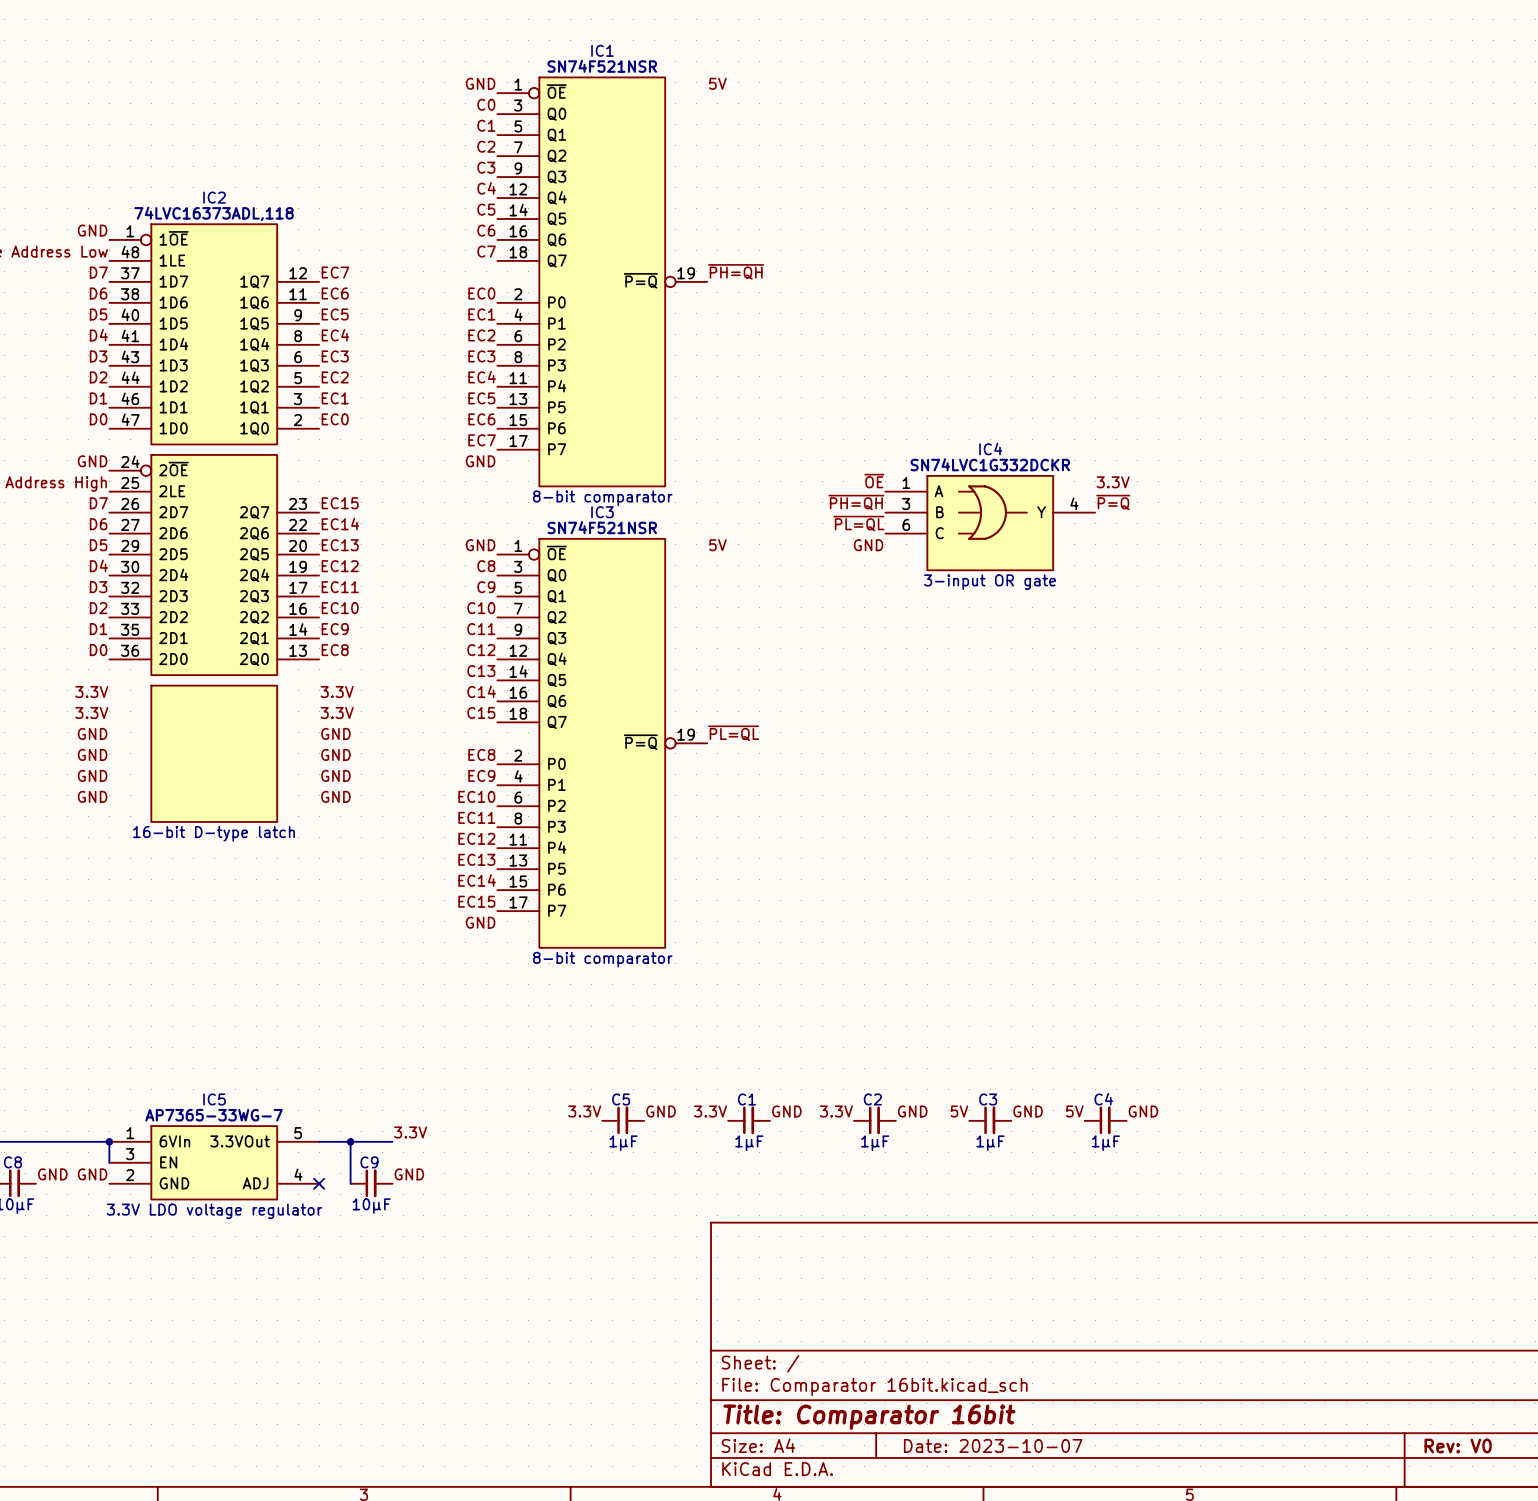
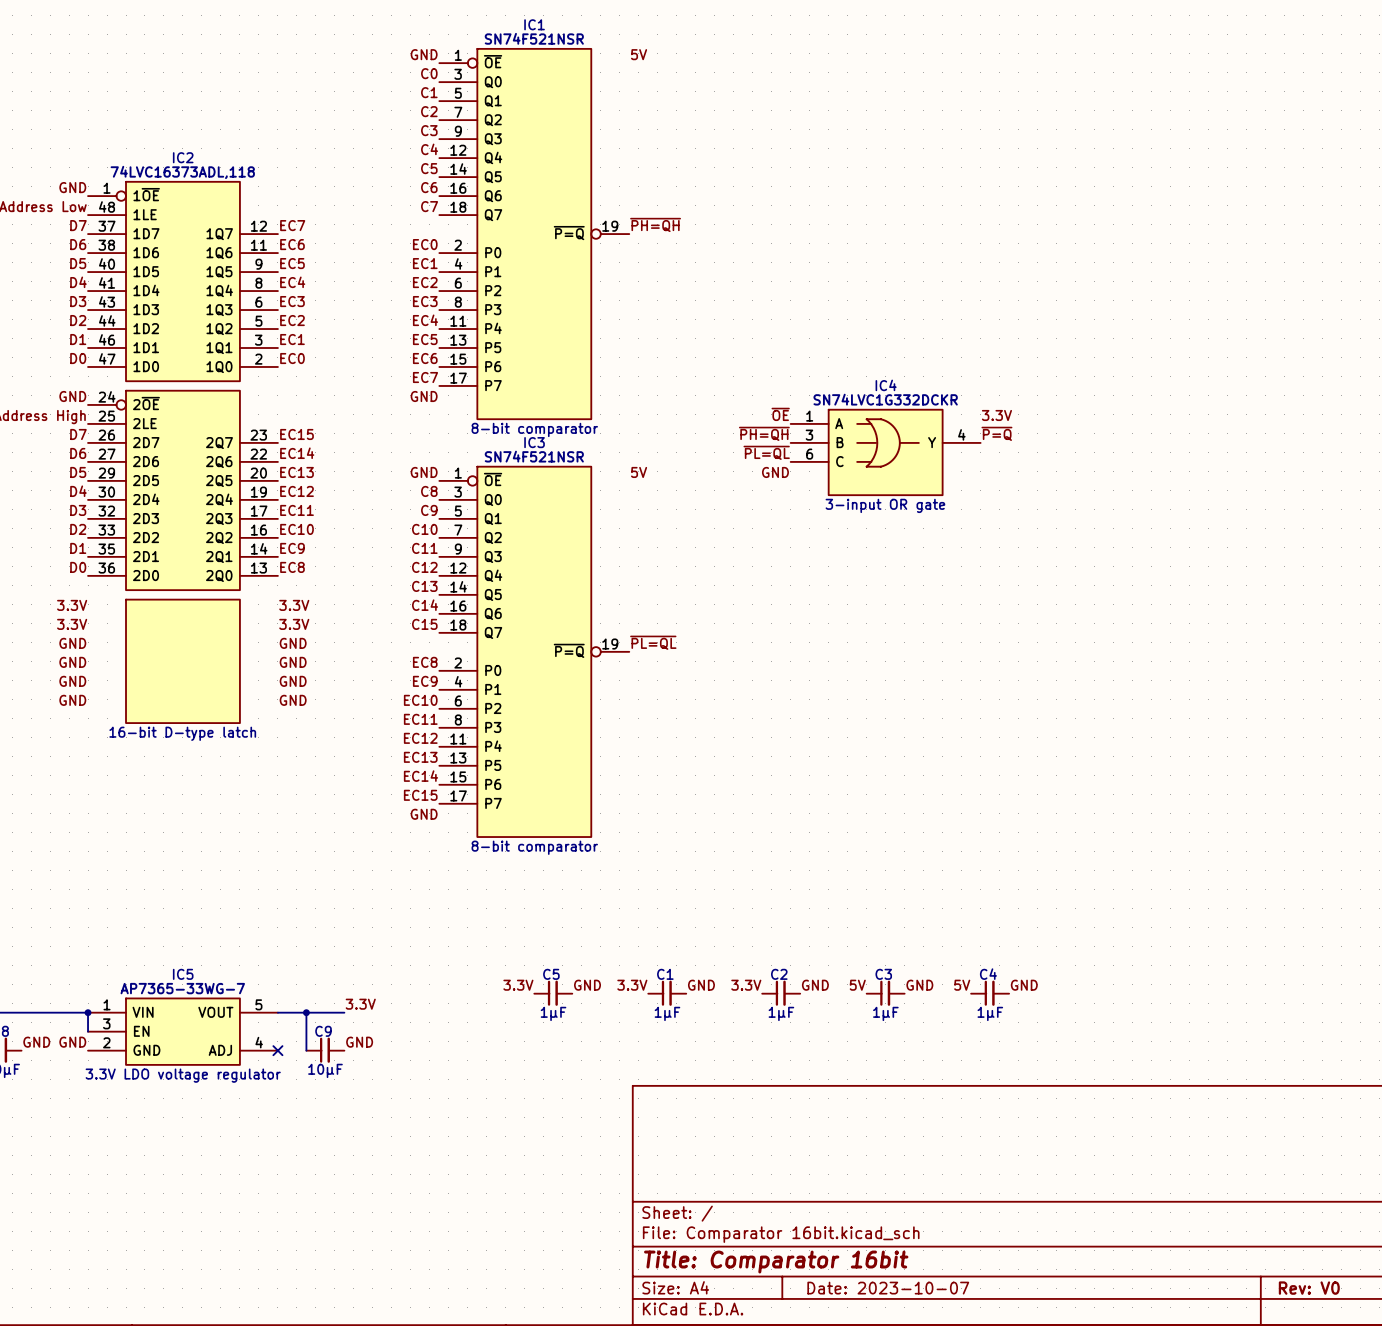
IC5 pin name: 6VIn (174, 1141) -> VIN (143, 1012)
IC5 pin name: 3.3VOut (240, 1141) -> VOUT (215, 1012)

